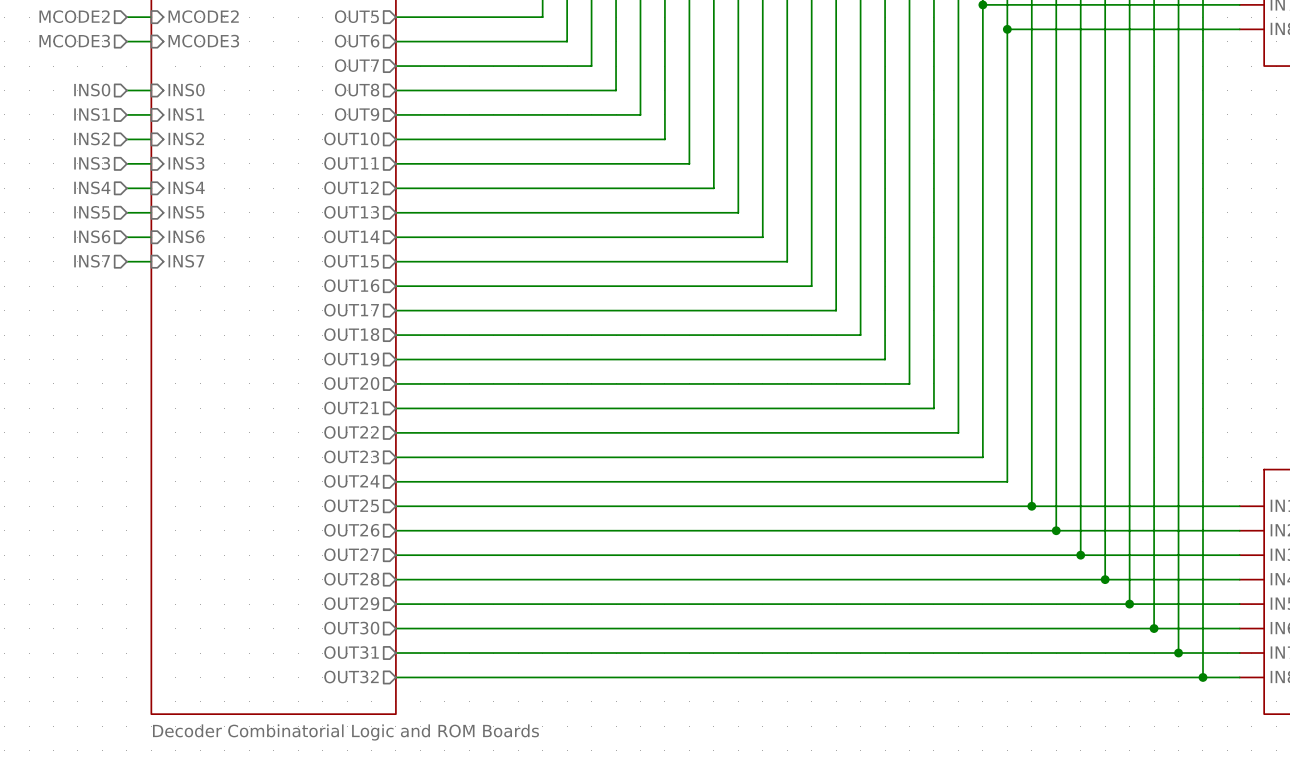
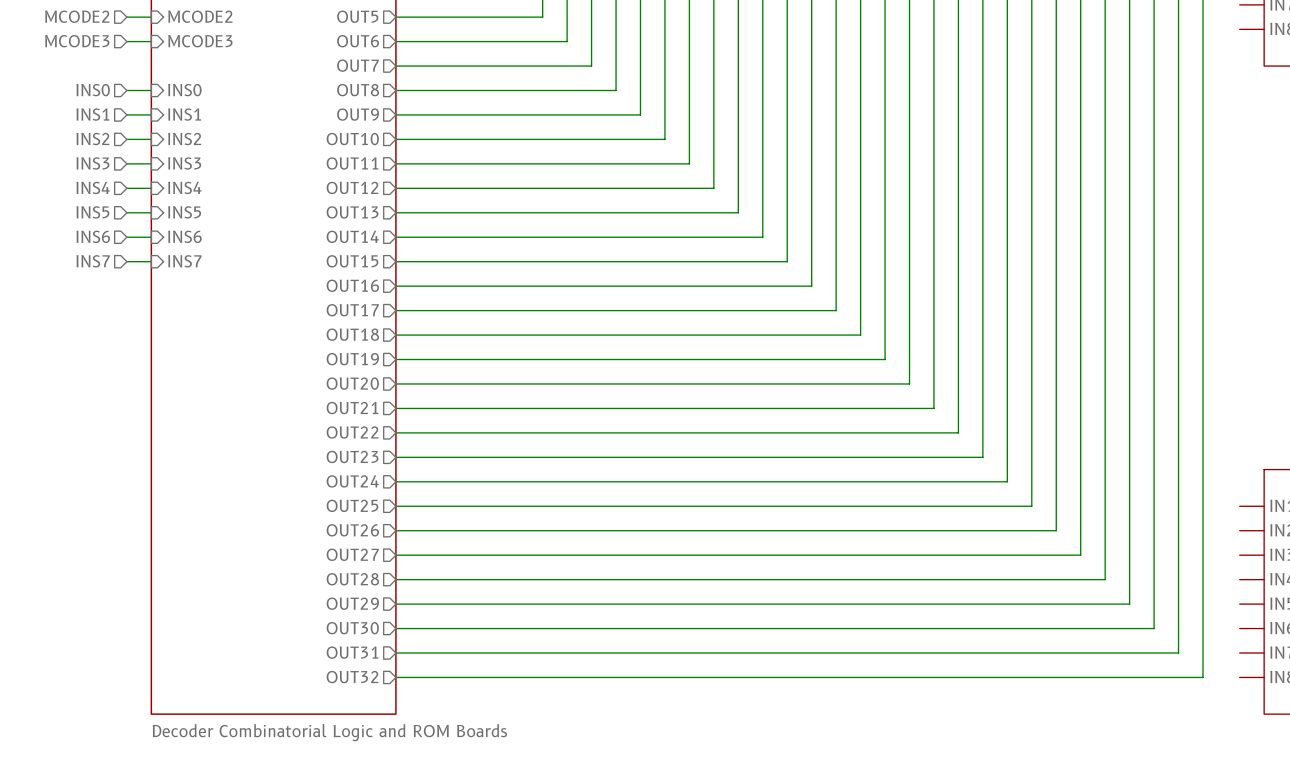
wire: (982, 4) (1239, 4) -> none
junction: (982, 4) -> none
wire: (1007, 29) (1239, 29) -> none
junction: (1007, 29) -> none
wire: (1031, 506) (1239, 506) -> none
junction: (1031, 506) -> none
wire: (1056, 530) (1239, 530) -> none
junction: (1056, 530) -> none
wire: (1080, 555) (1239, 555) -> none
junction: (1080, 555) -> none
wire: (1105, 579) (1239, 579) -> none
junction: (1105, 579) -> none
wire: (1129, 604) (1239, 604) -> none
junction: (1129, 604) -> none
wire: (1154, 628) (1239, 628) -> none
junction: (1154, 628) -> none
wire: (1178, 653) (1239, 653) -> none
junction: (1178, 653) -> none
wire: (1202, 677) (1239, 677) -> none
junction: (1202, 677) -> none

